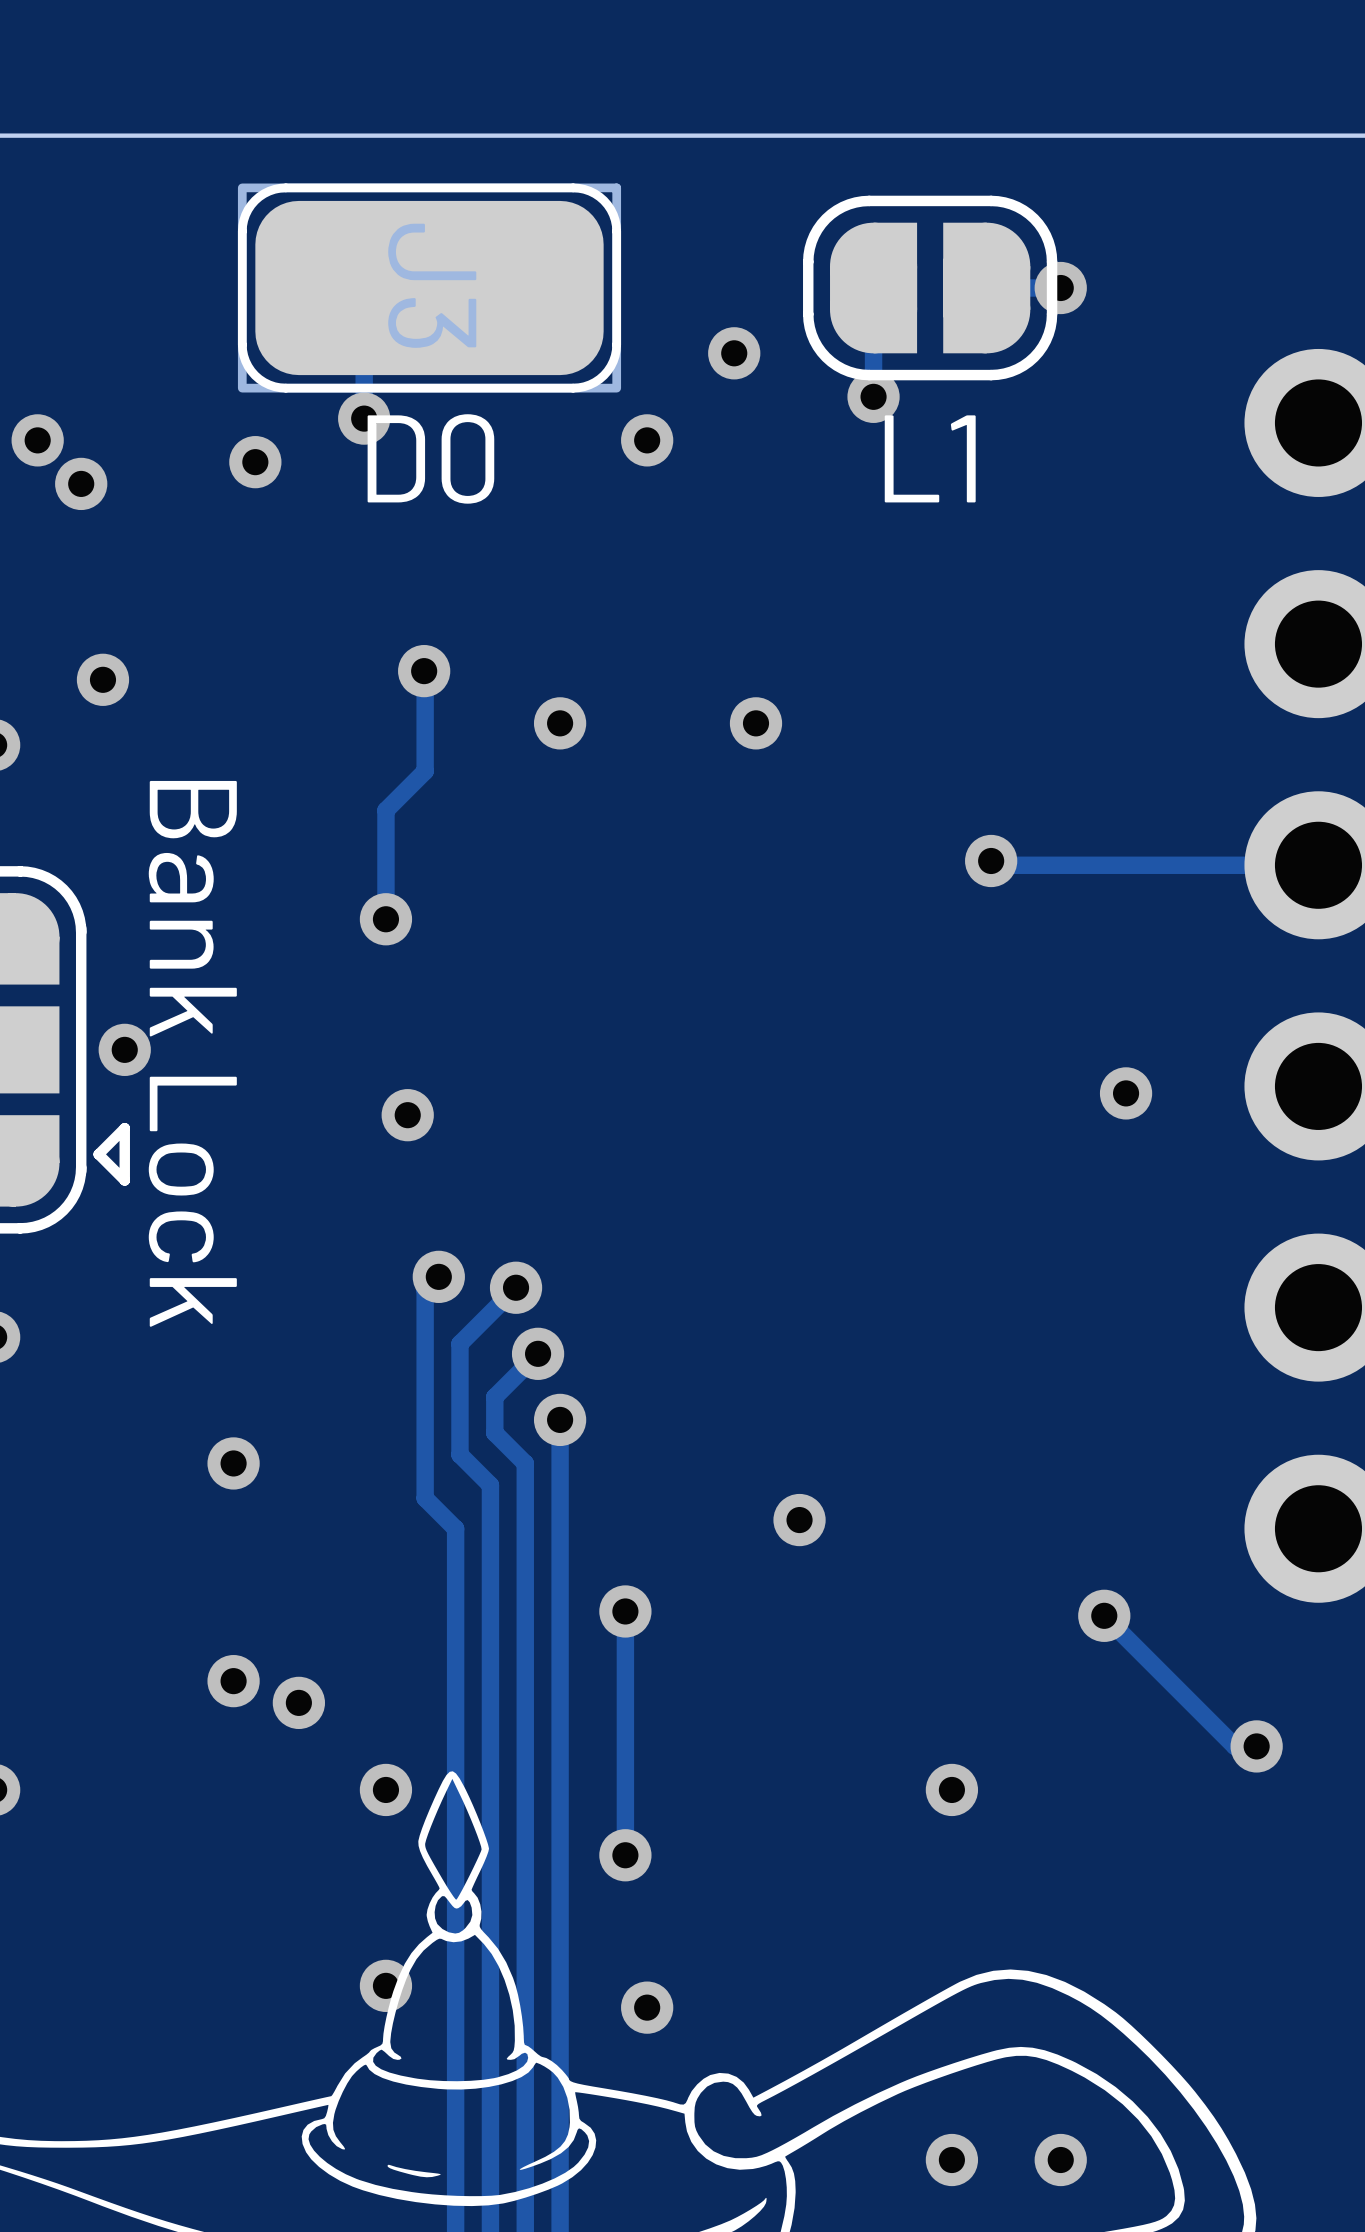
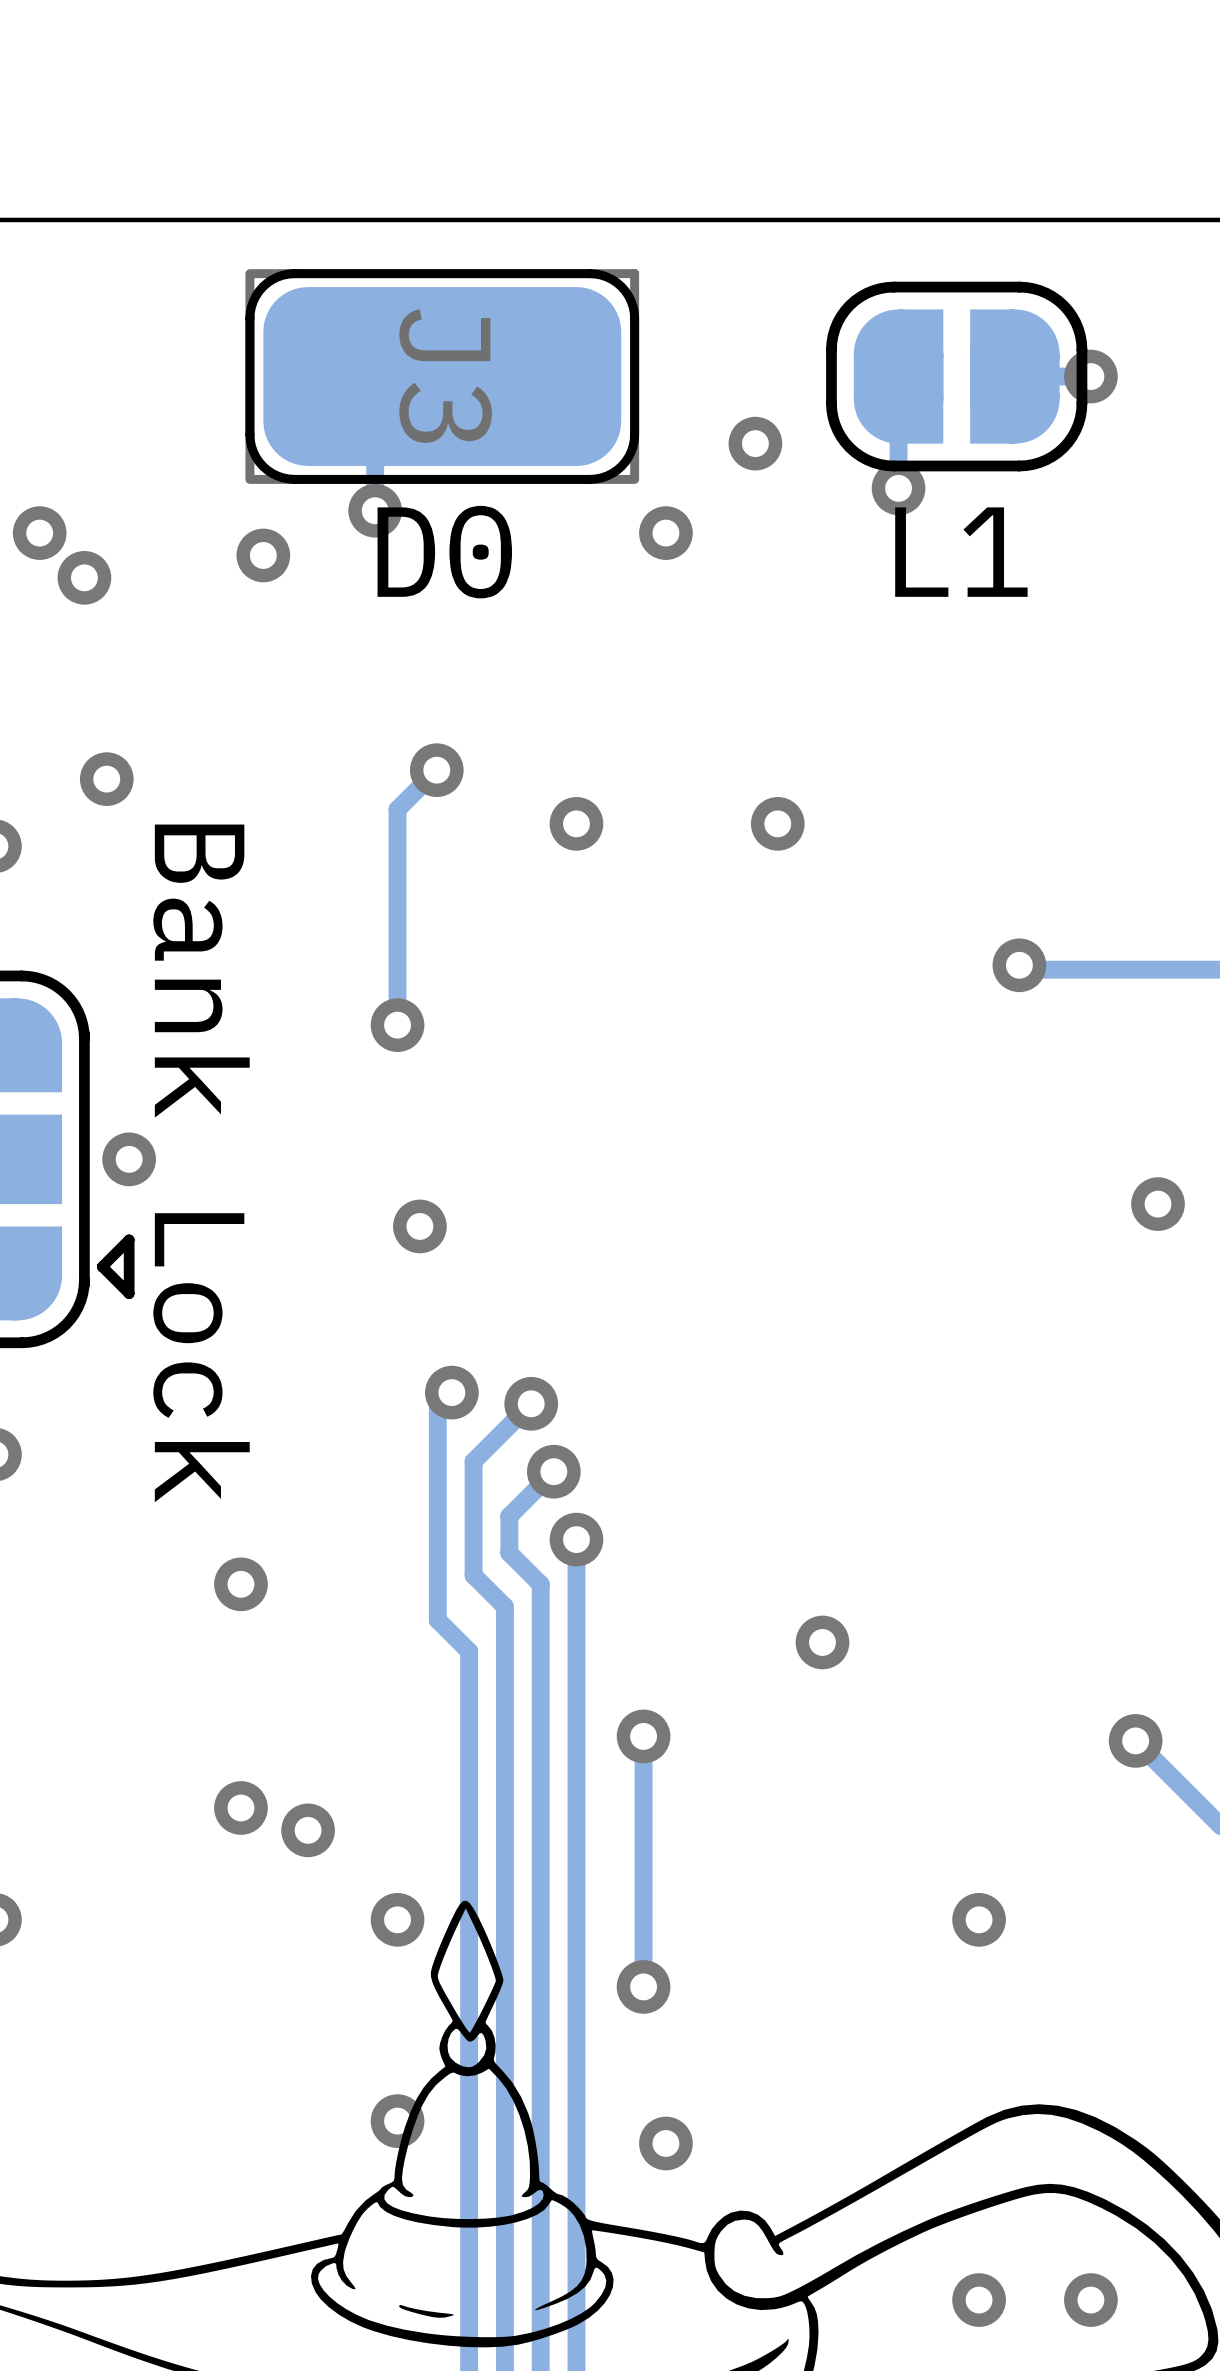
track: (425, 672) (425, 771) (385, 810) -> (436, 770) (397, 809) (397, 913)

